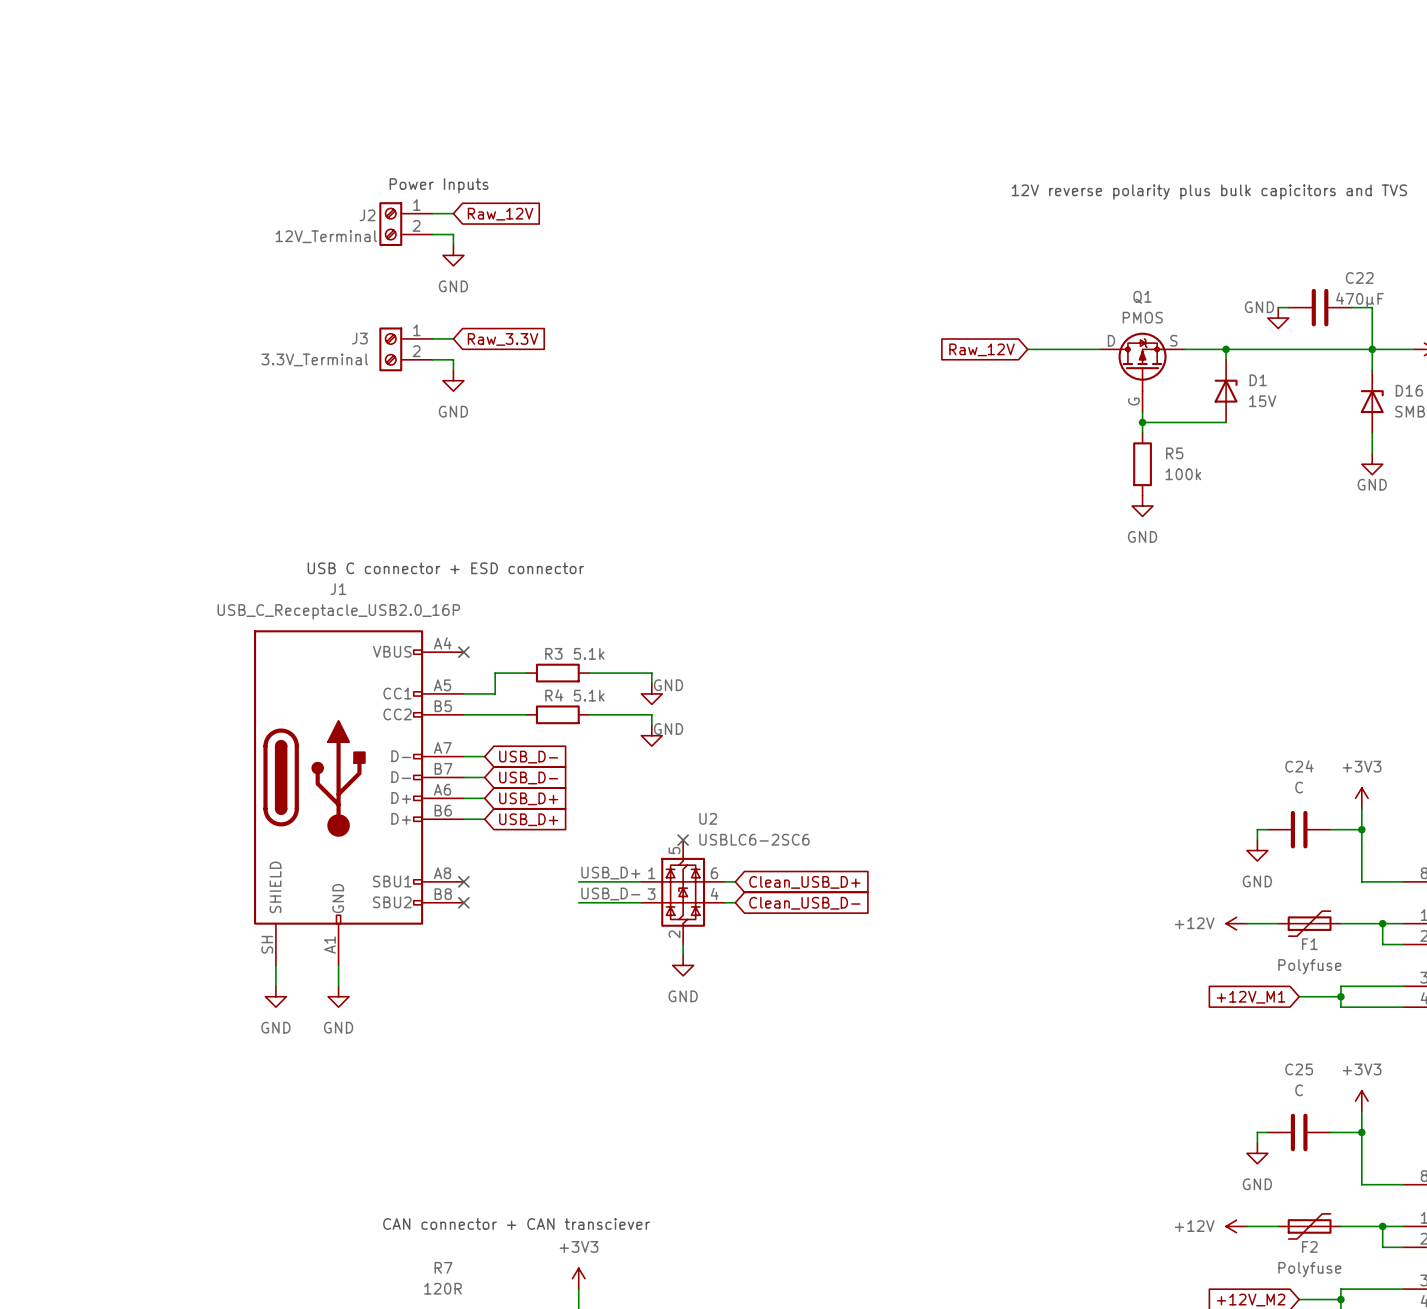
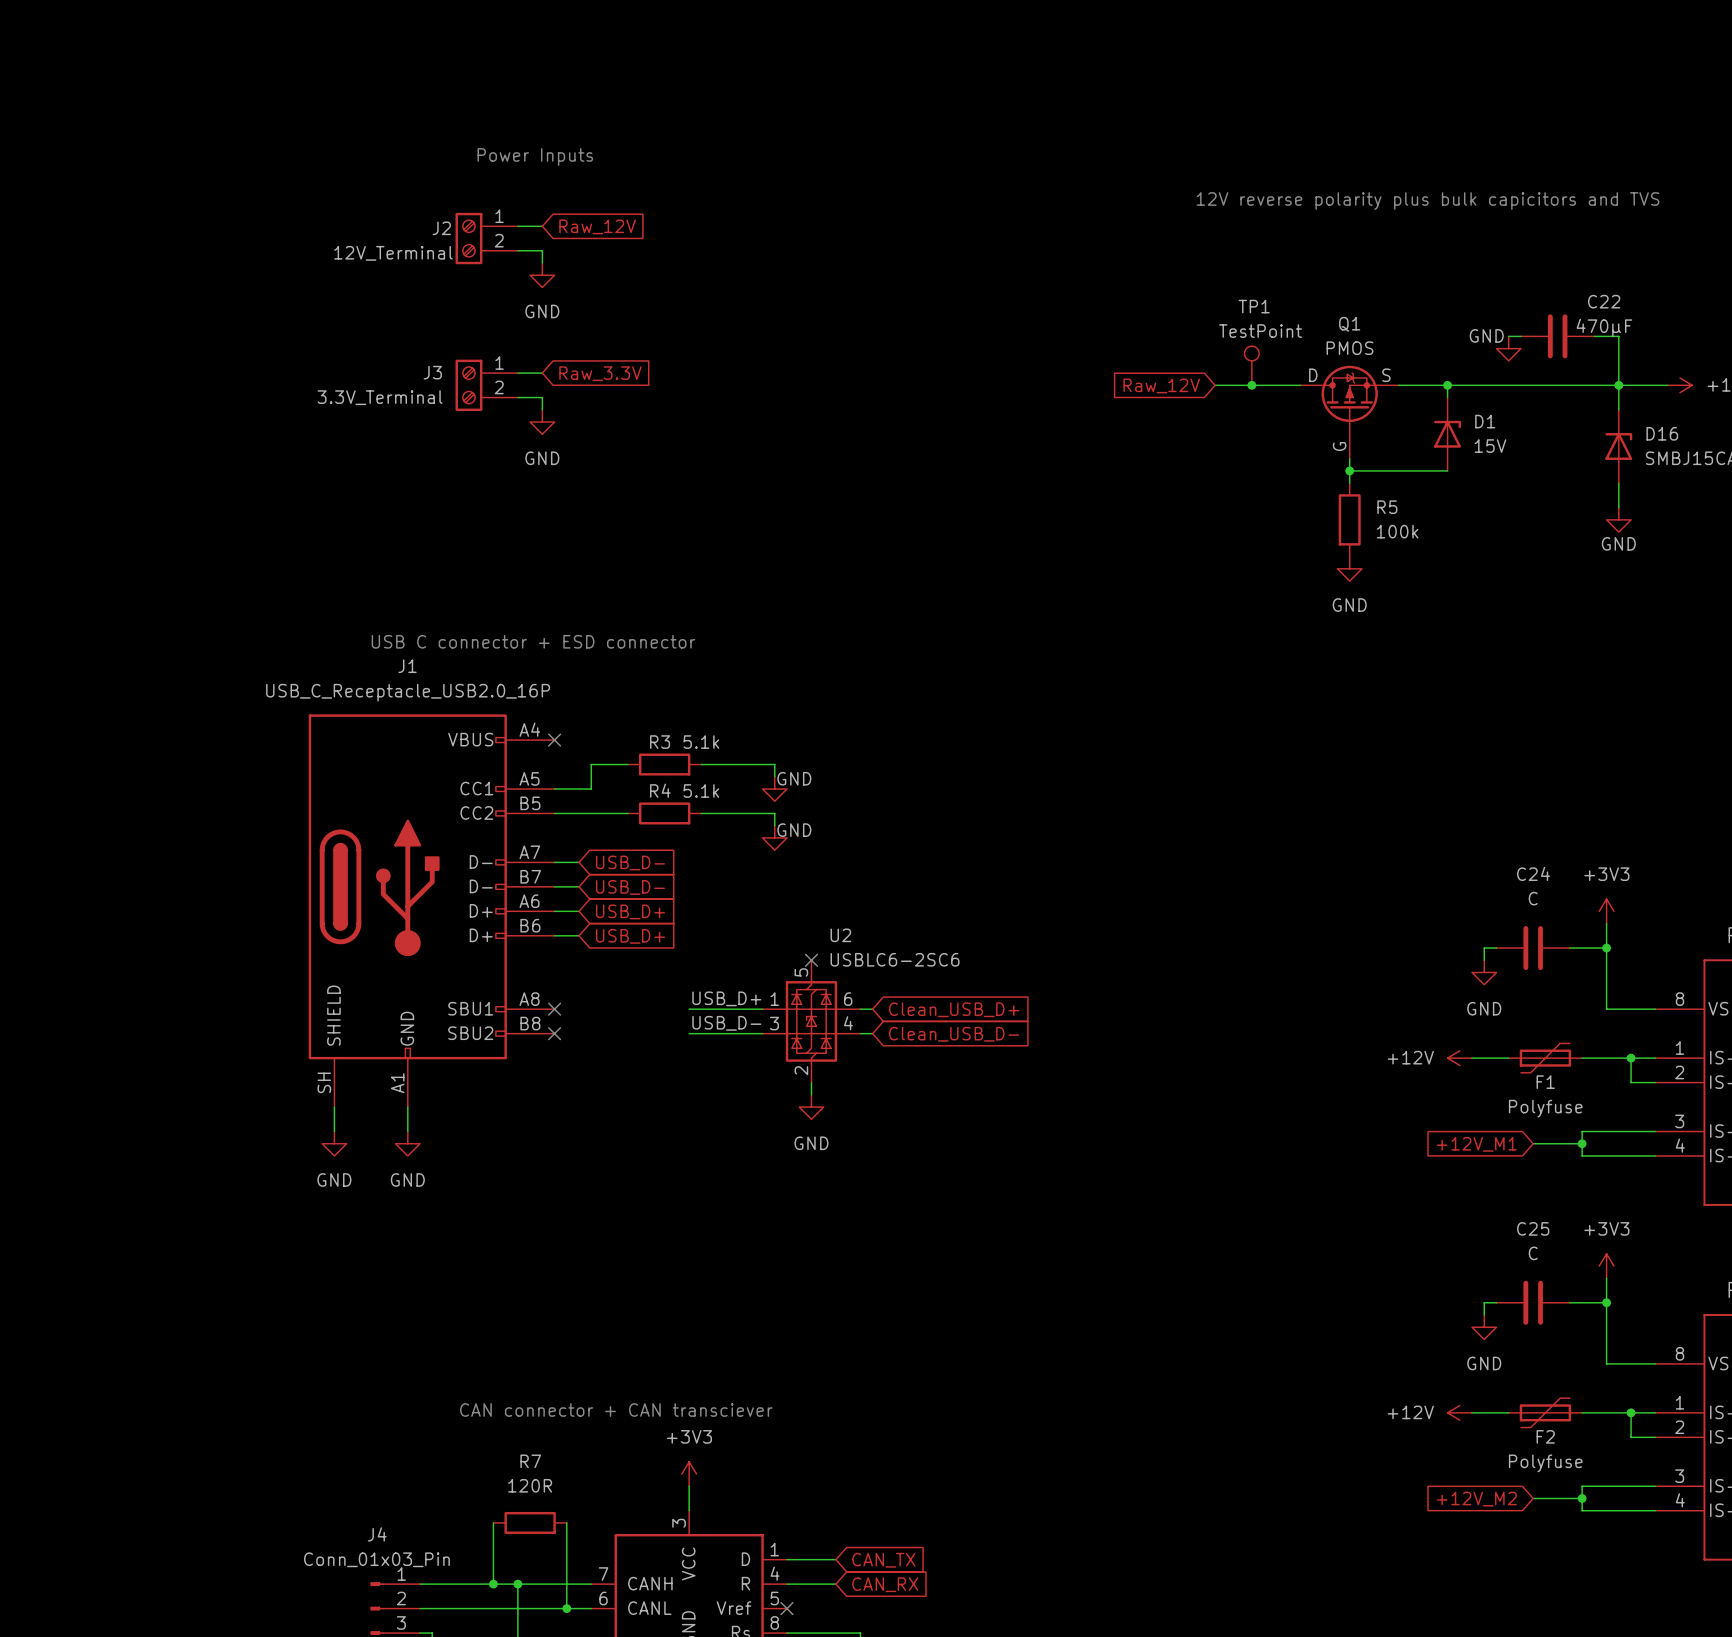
text position: Power Inputs (439, 185) -> Power Inputs (535, 156)
TP1: none -> TestPoint (1251, 365)
junction: none -> (1251, 385)

